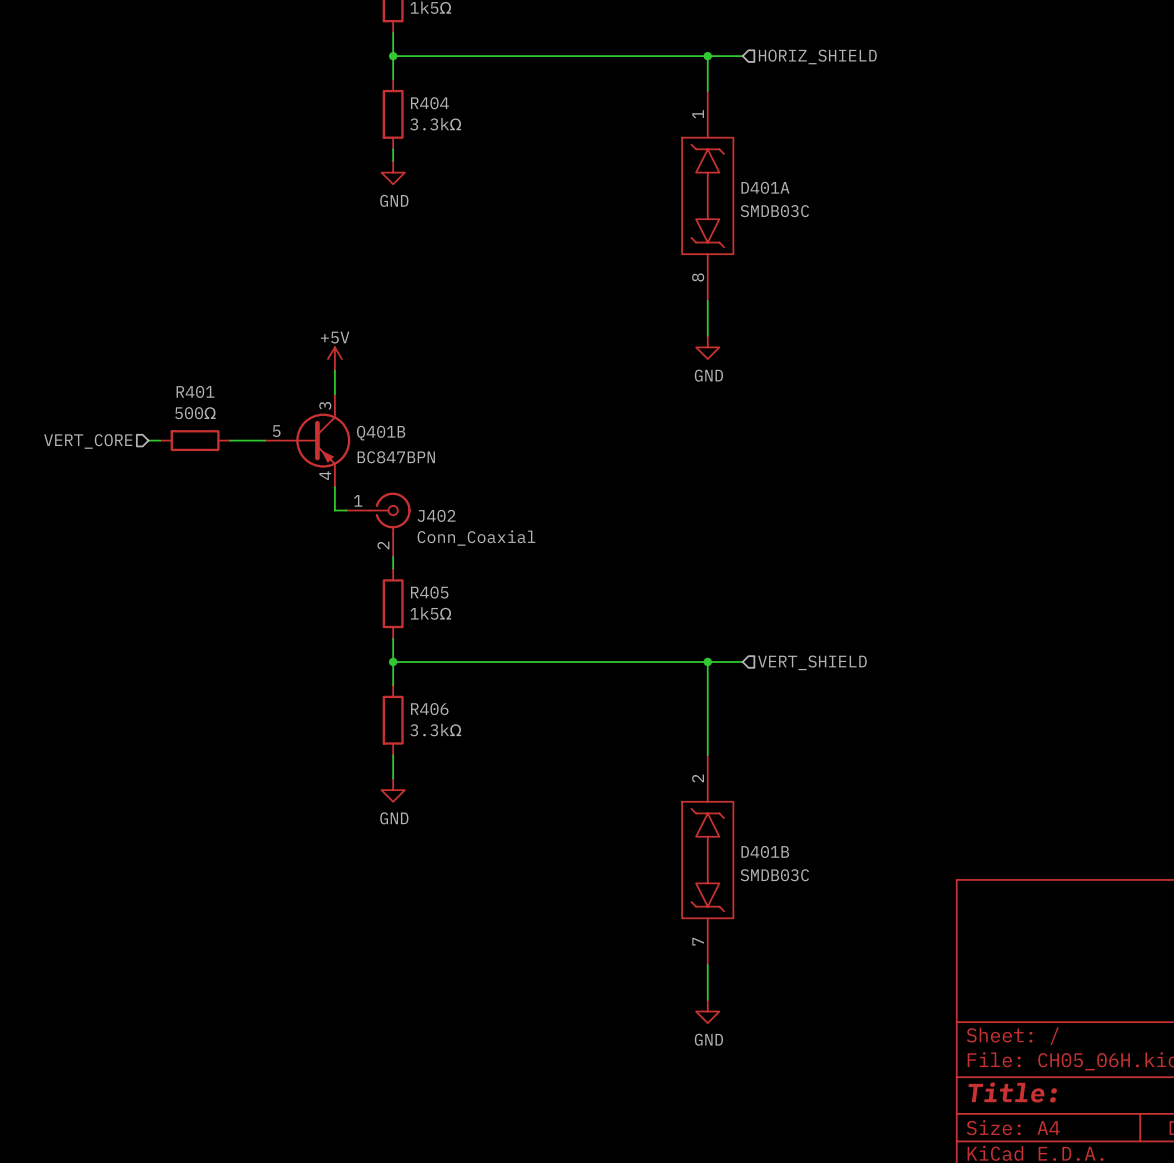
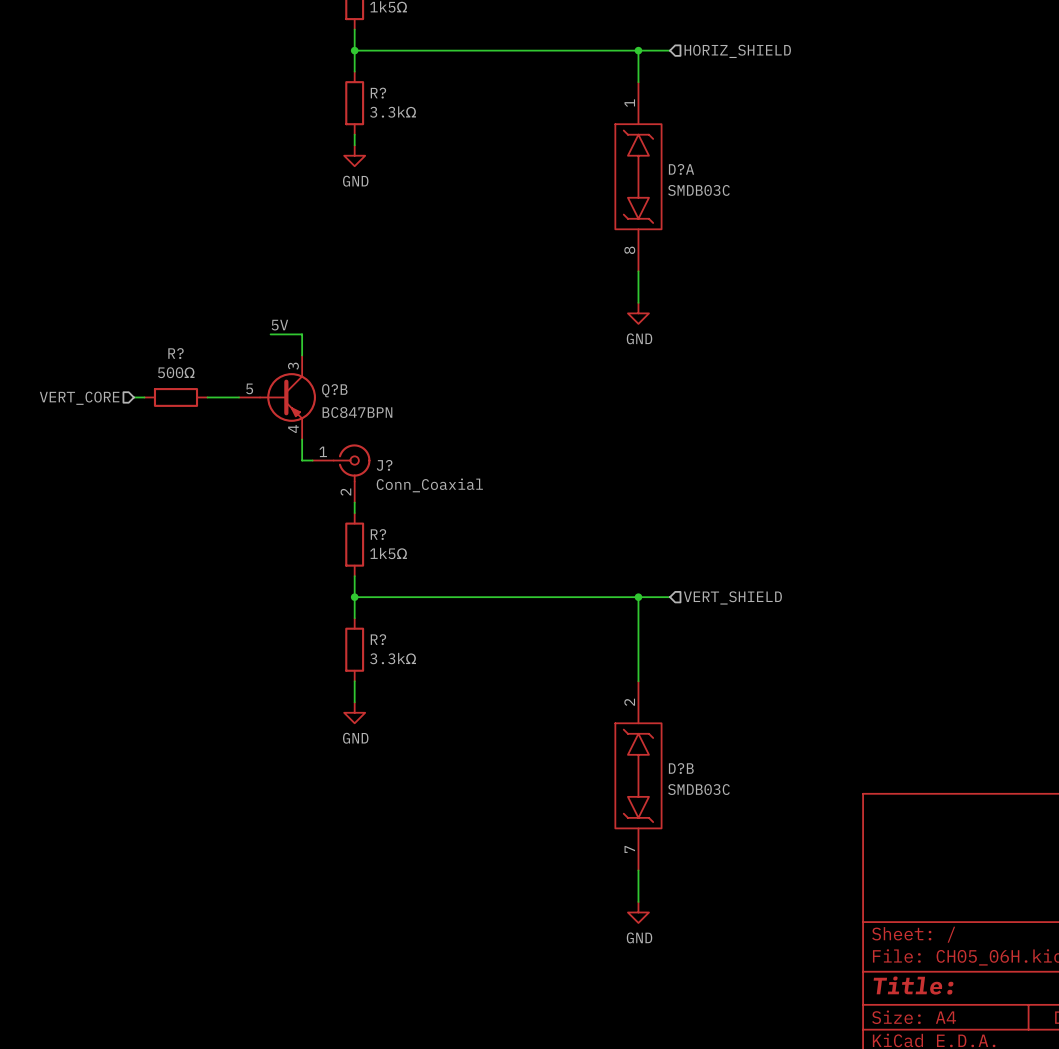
R404 name: R404 (429, 103) -> R? (378, 93)
D401A name: D401A (765, 187) -> D?A (681, 169)
power symbol: +5V (334, 359) -> none
label: none -> 5V (279, 325)
wire: none -> (270, 334) (302, 334)
R401 name: R401 (195, 391) -> R? (176, 353)
Q401B name: Q401B (381, 433) -> Q?B (334, 390)
J402 name: J402 (436, 515) -> J? (384, 465)
R405 name: R405 (429, 592) -> R? (378, 534)
R406 name: R406 (429, 709) -> R? (378, 639)
D401B name: D401B (765, 851) -> D?B (681, 768)

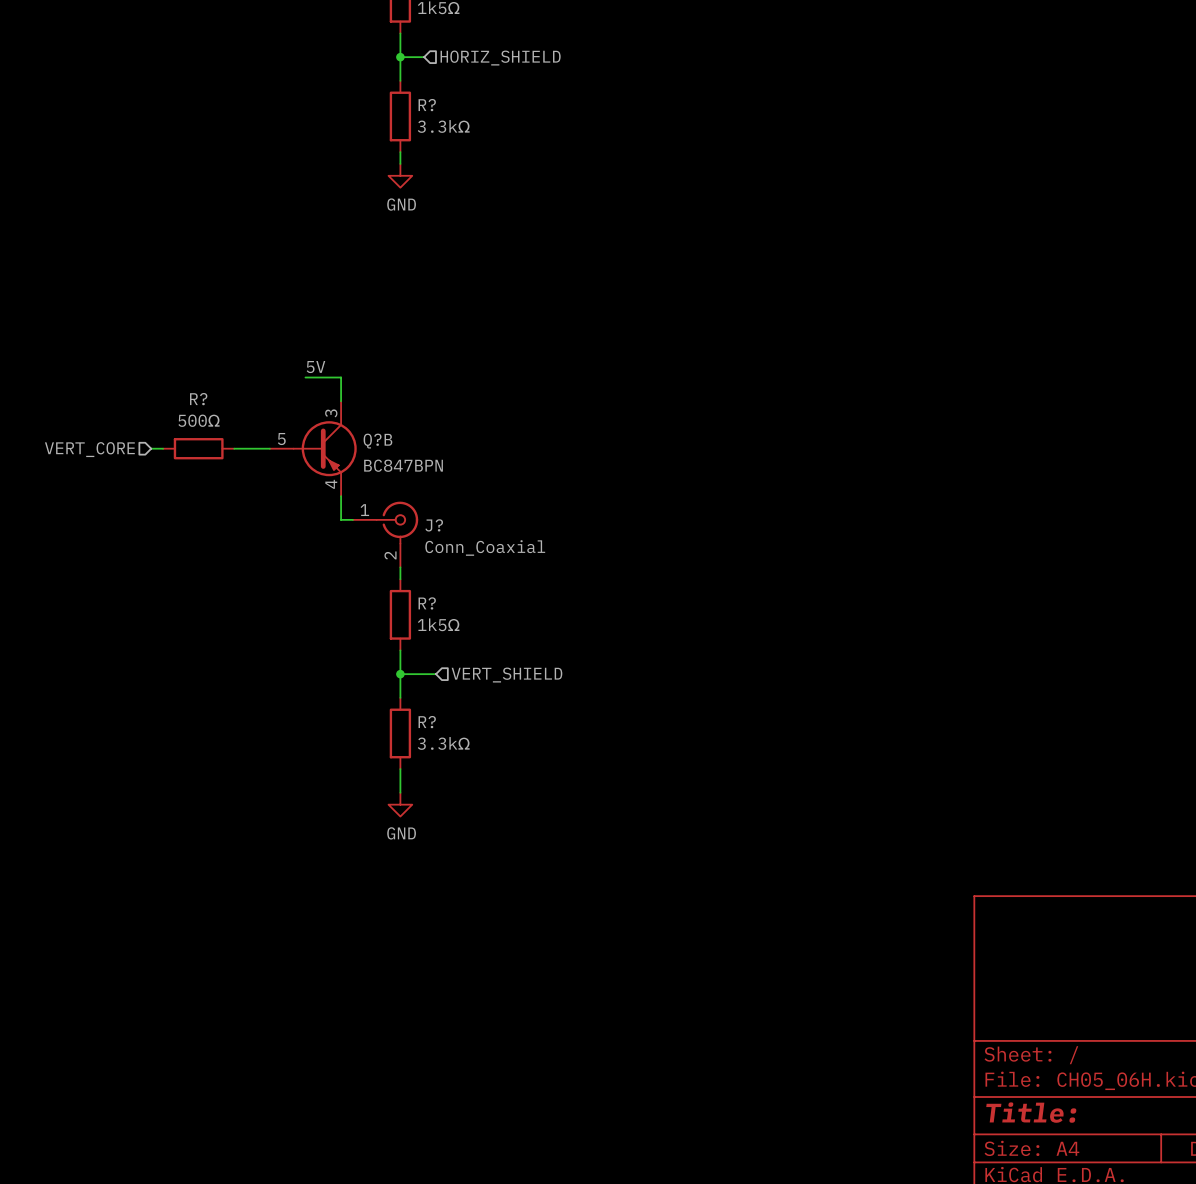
wire: (375, 50) (669, 50) -> none
wire: (638, 50) (638, 82) -> none
junction: (638, 50) -> none
hierarchical label: none -> HORIZ_SHIELD (500, 58)
hierarchical label: HORIZ_SHIELD (737, 51) -> none
D?A: SMDB03C (638, 176) -> none
wire: (638, 271) (638, 302) -> none
power symbol: GND (638, 313) -> none
wire: (386, 597) (669, 597) -> none
hierarchical label: none -> VERT_SHIELD (506, 675)
wire: (638, 597) (638, 681) -> none
junction: (638, 597) -> none
hierarchical label: VERT_SHIELD (732, 597) -> none
D?B: SMDB03C (638, 775) -> none
wire: (638, 870) (638, 901) -> none
power symbol: GND (638, 912) -> none

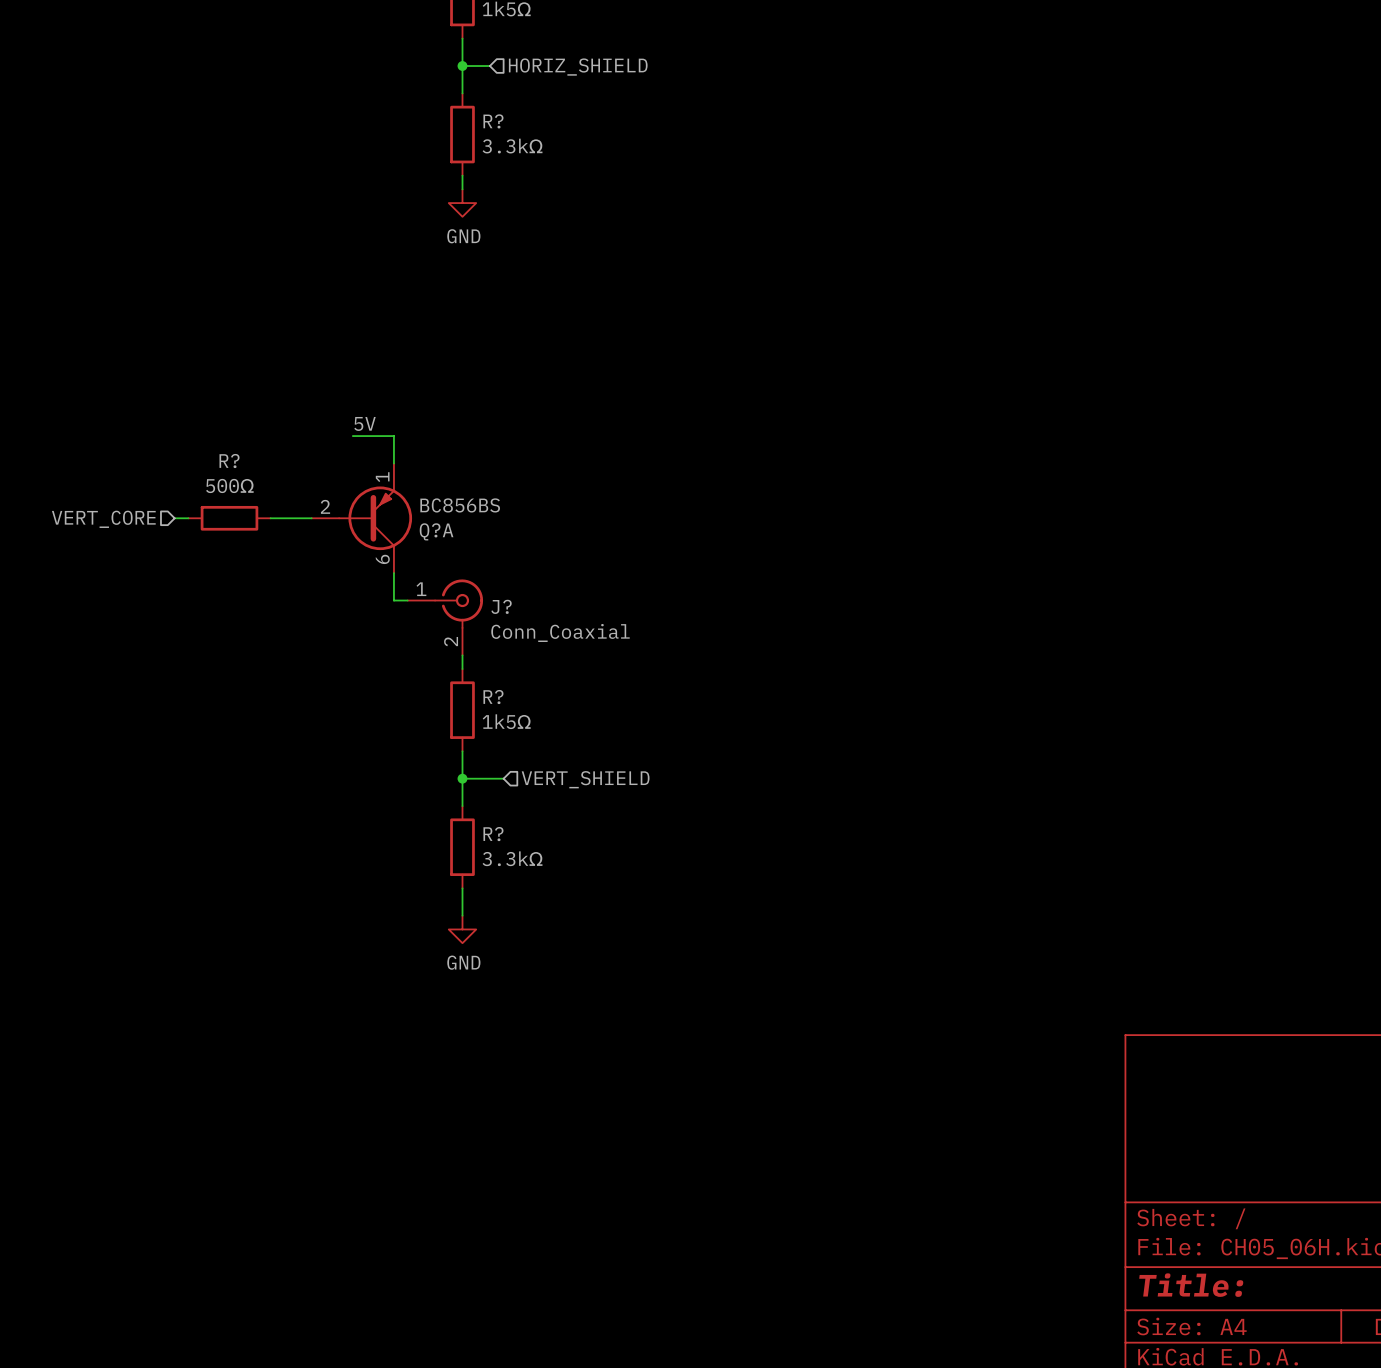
Q?B: BC847BPN (313, 448) -> none
Q?A: none -> BC856BS (361, 518)

